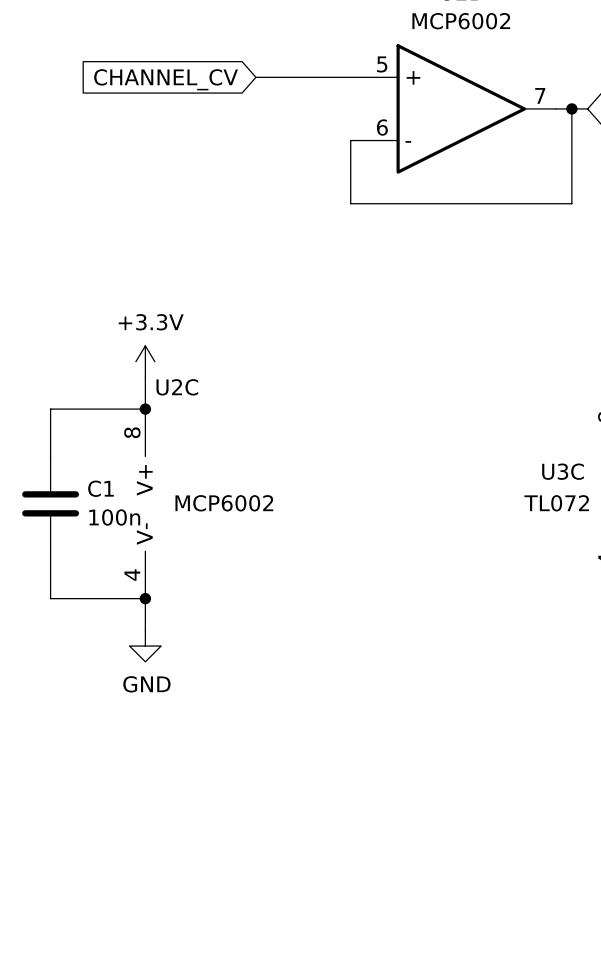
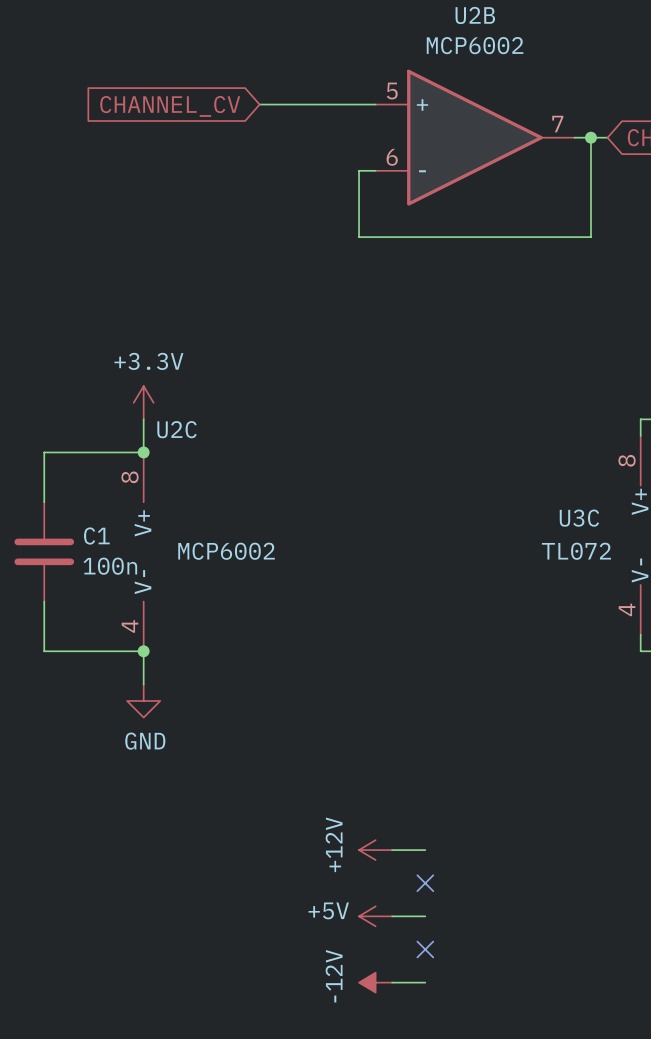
power symbol: none -> +12V (375, 850)
wire: none -> (392, 850) (425, 850)
no-connect mark: none -> (425, 883)
power symbol: none -> +5V (375, 916)
wire: none -> (392, 916) (425, 916)
no-connect mark: none -> (425, 949)
power symbol: none -> -12V (375, 982)
wire: none -> (392, 982) (425, 982)

